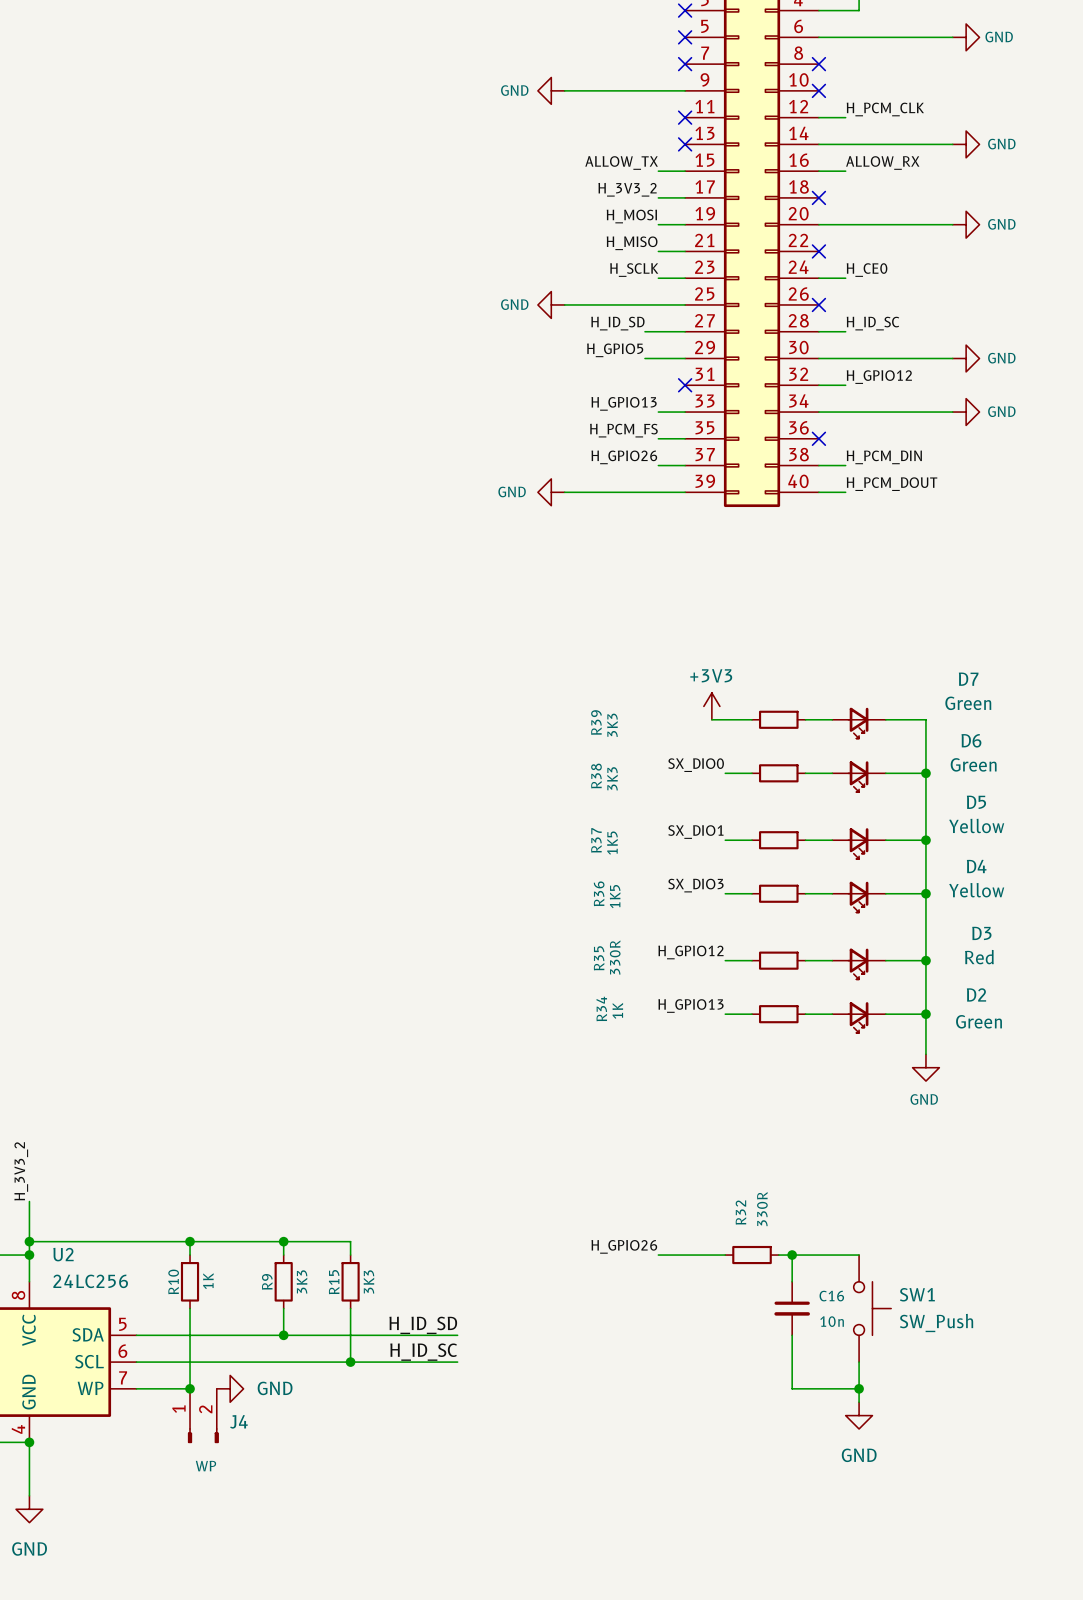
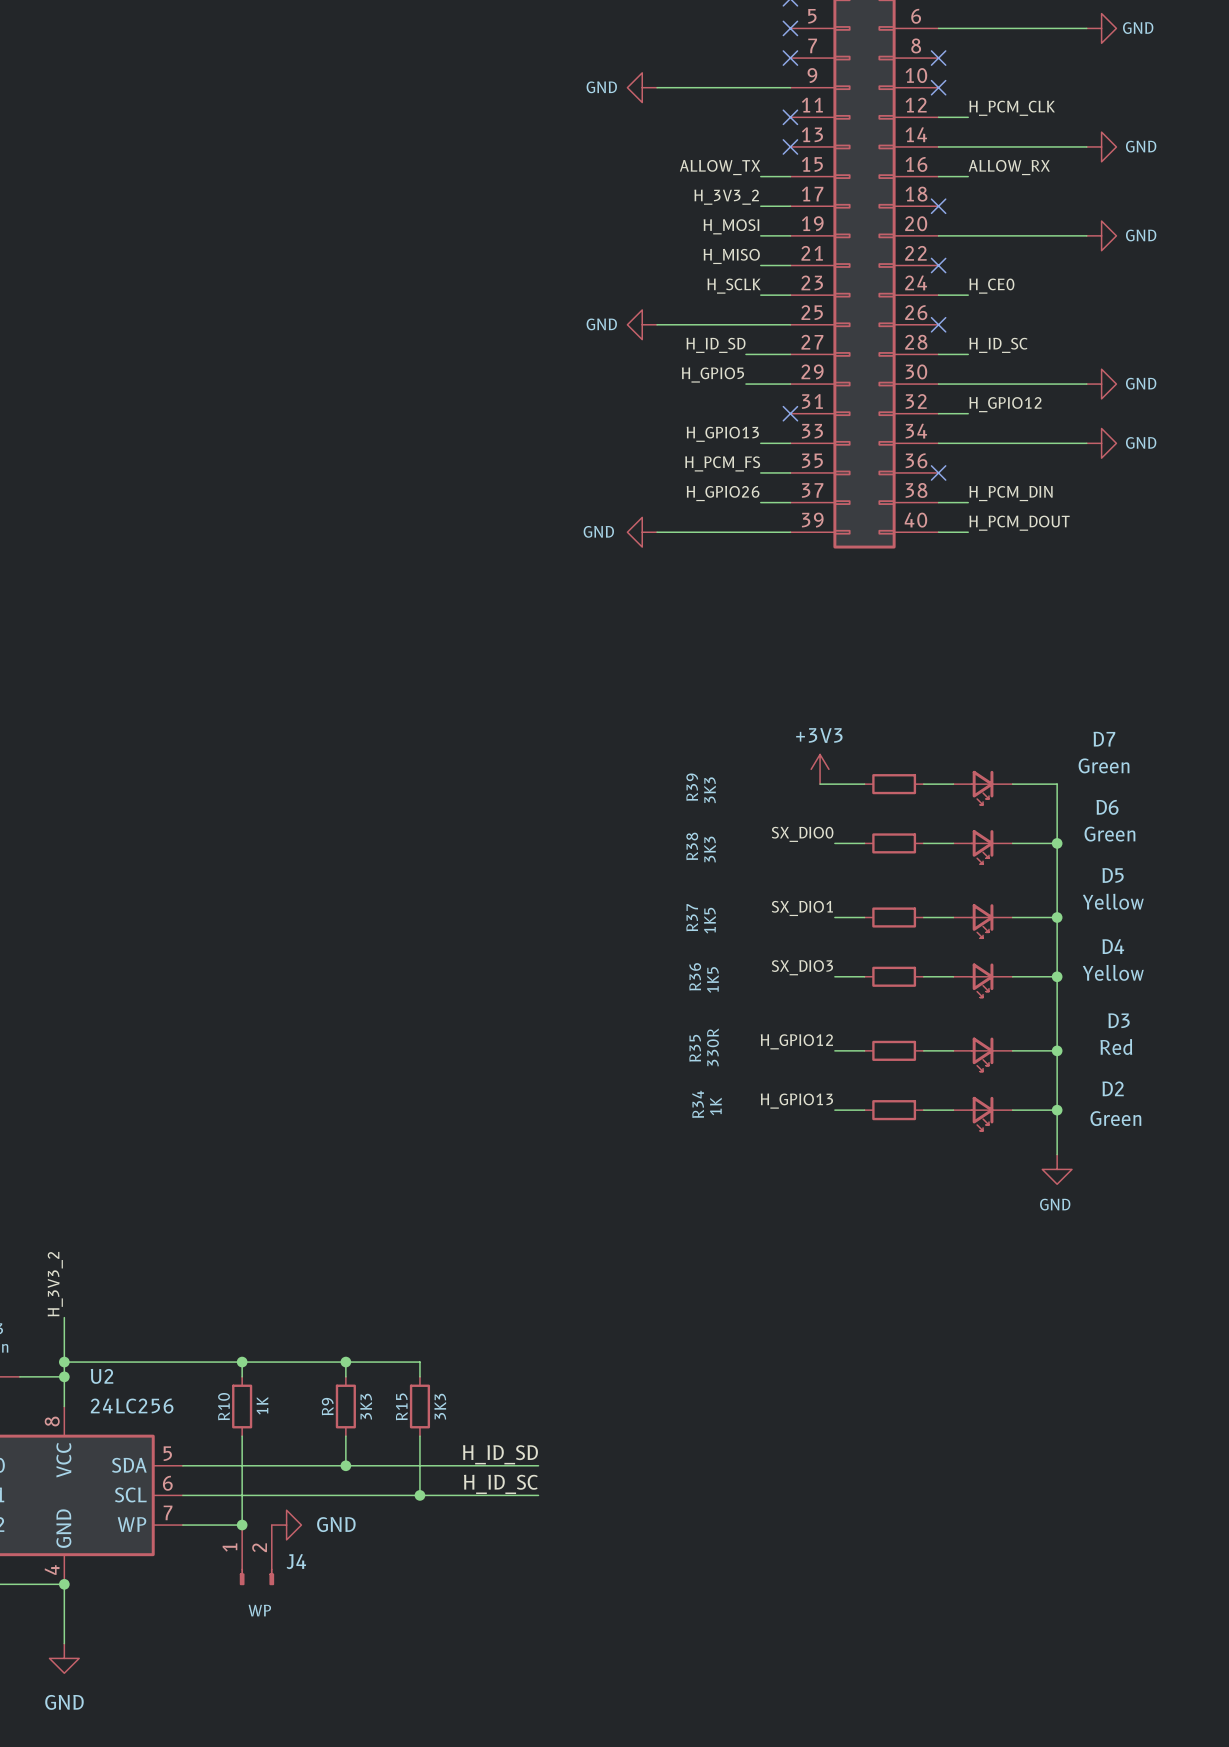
label: H_GPIO26 (624, 1246) -> none
wire: (658, 1255) (725, 1255) -> none
R32: 330R (752, 1255) -> none
wire: (778, 1255) (859, 1255) -> none
wire: (792, 1255) (792, 1281) -> none
junction: (792, 1255) -> none
C16: 10n (792, 1308) -> none
SW1: SW_Push (872, 1308) -> none
wire: (792, 1335) (792, 1388) (859, 1388) -> none
wire: (859, 1362) (859, 1402) -> none
junction: (859, 1388) -> none
power symbol: GND (859, 1415) -> none

